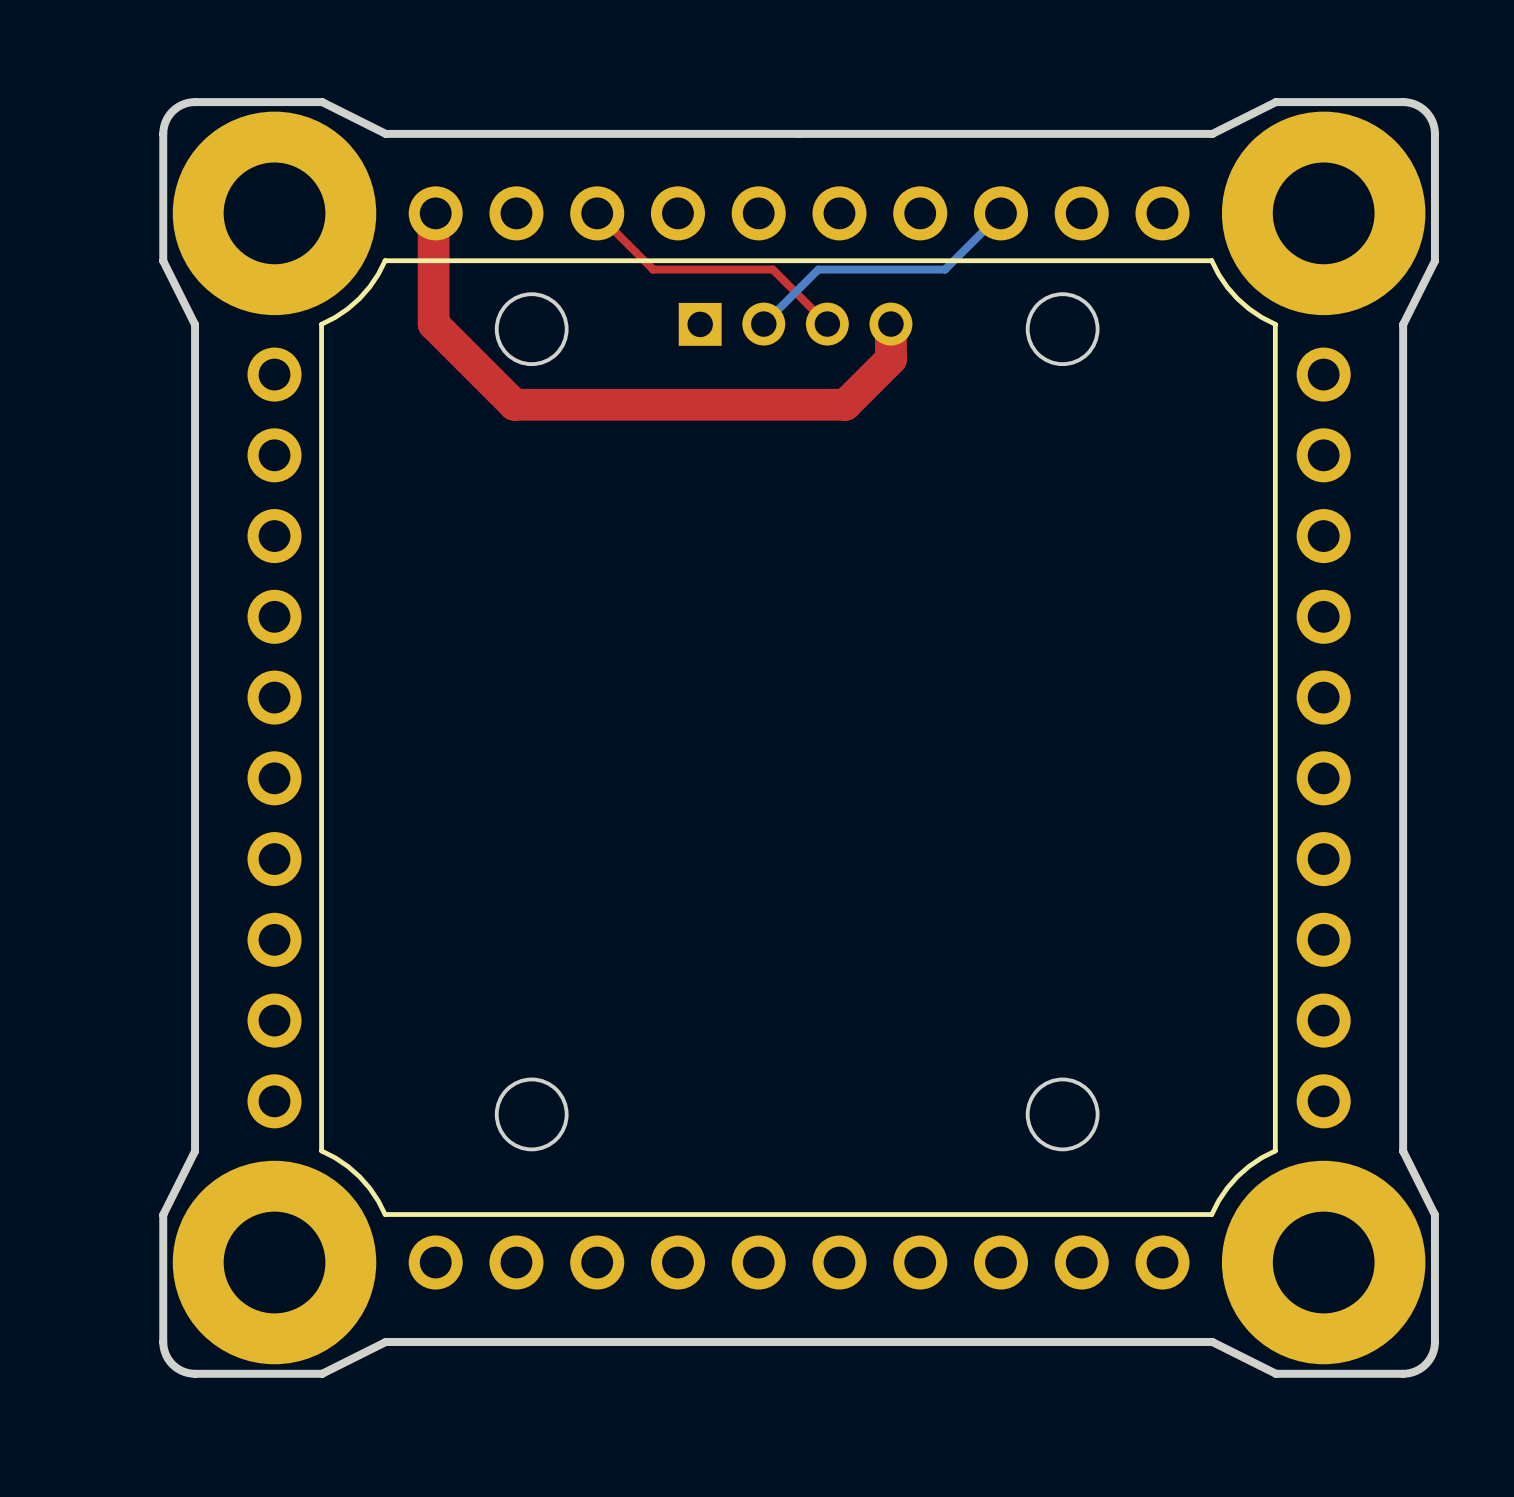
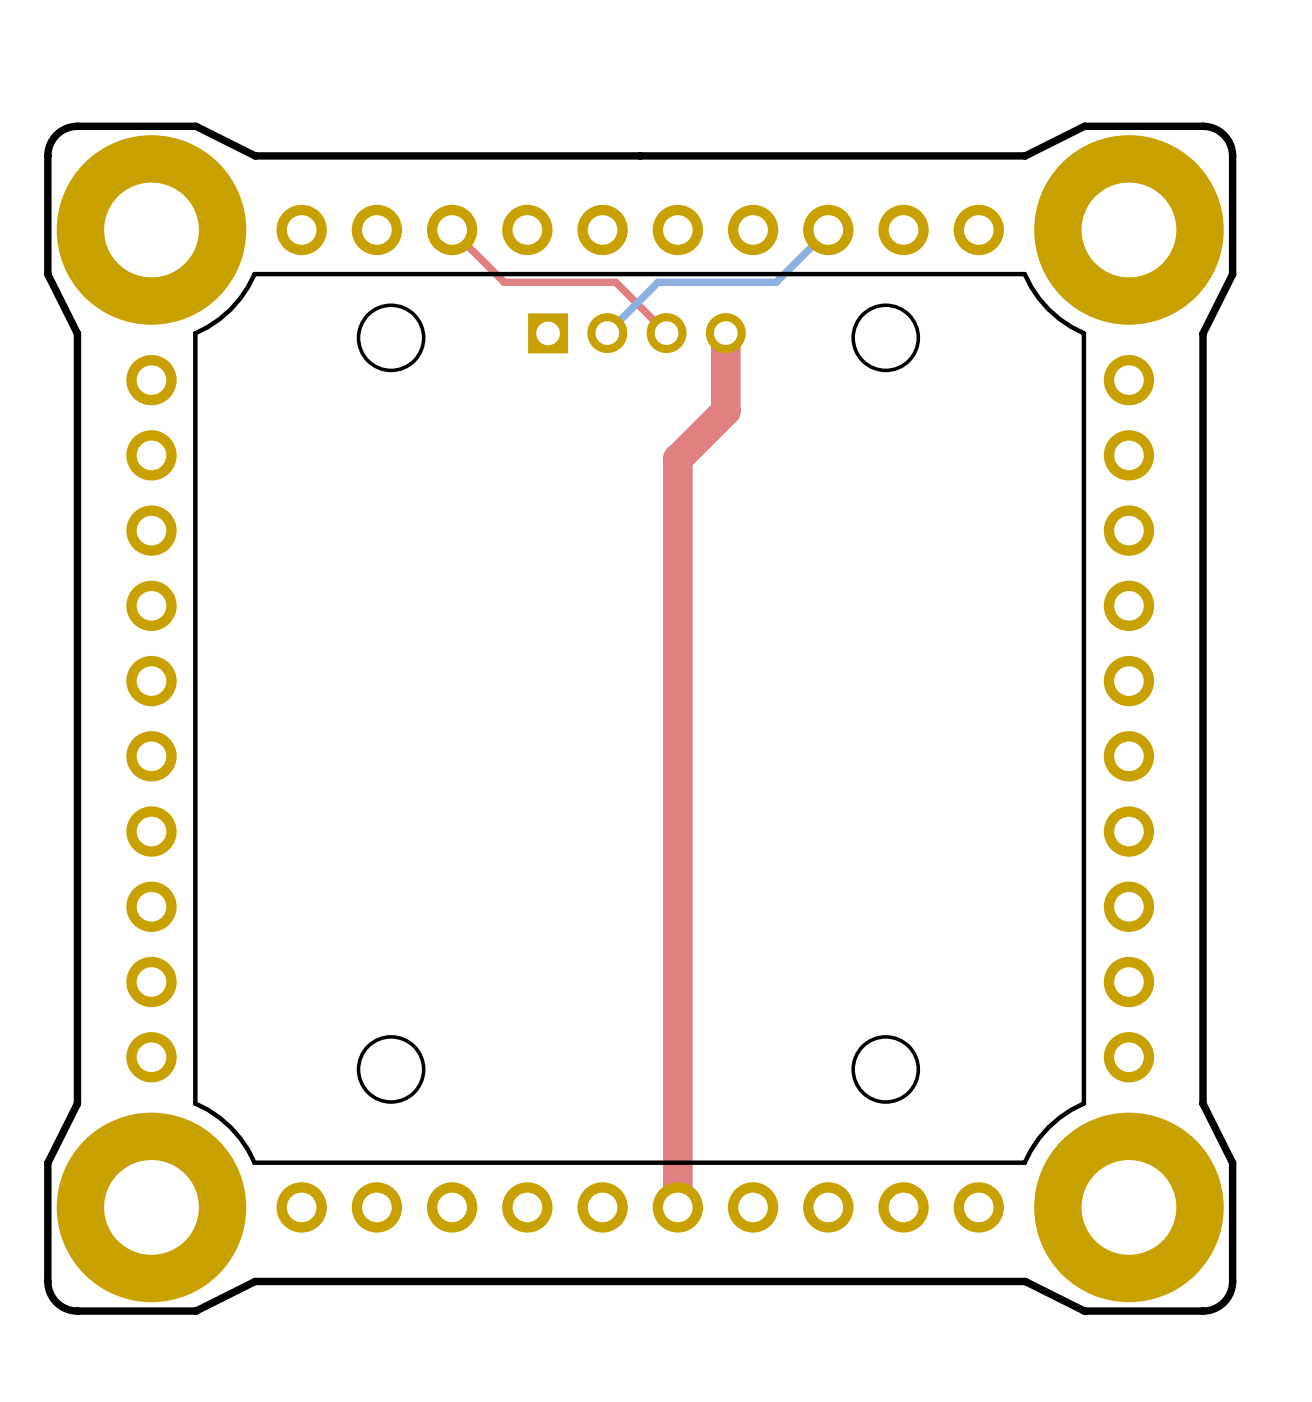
top track: (435, 213) (433, 215) (433, 324) (514, 404) (845, 404) (890, 359) -> (677, 1207) (677, 458) (725, 411) (725, 365)

